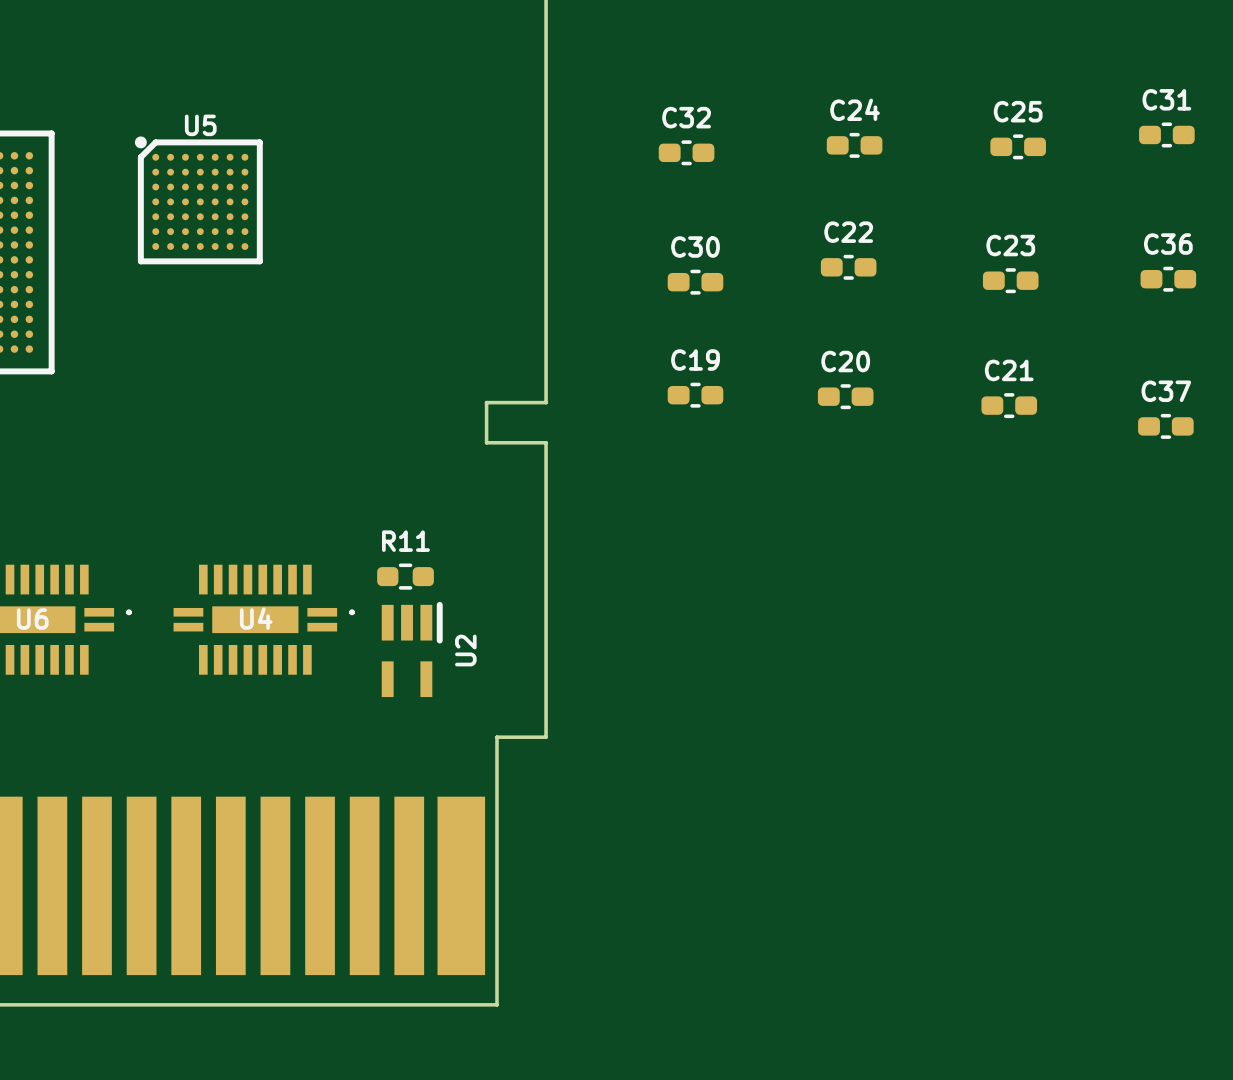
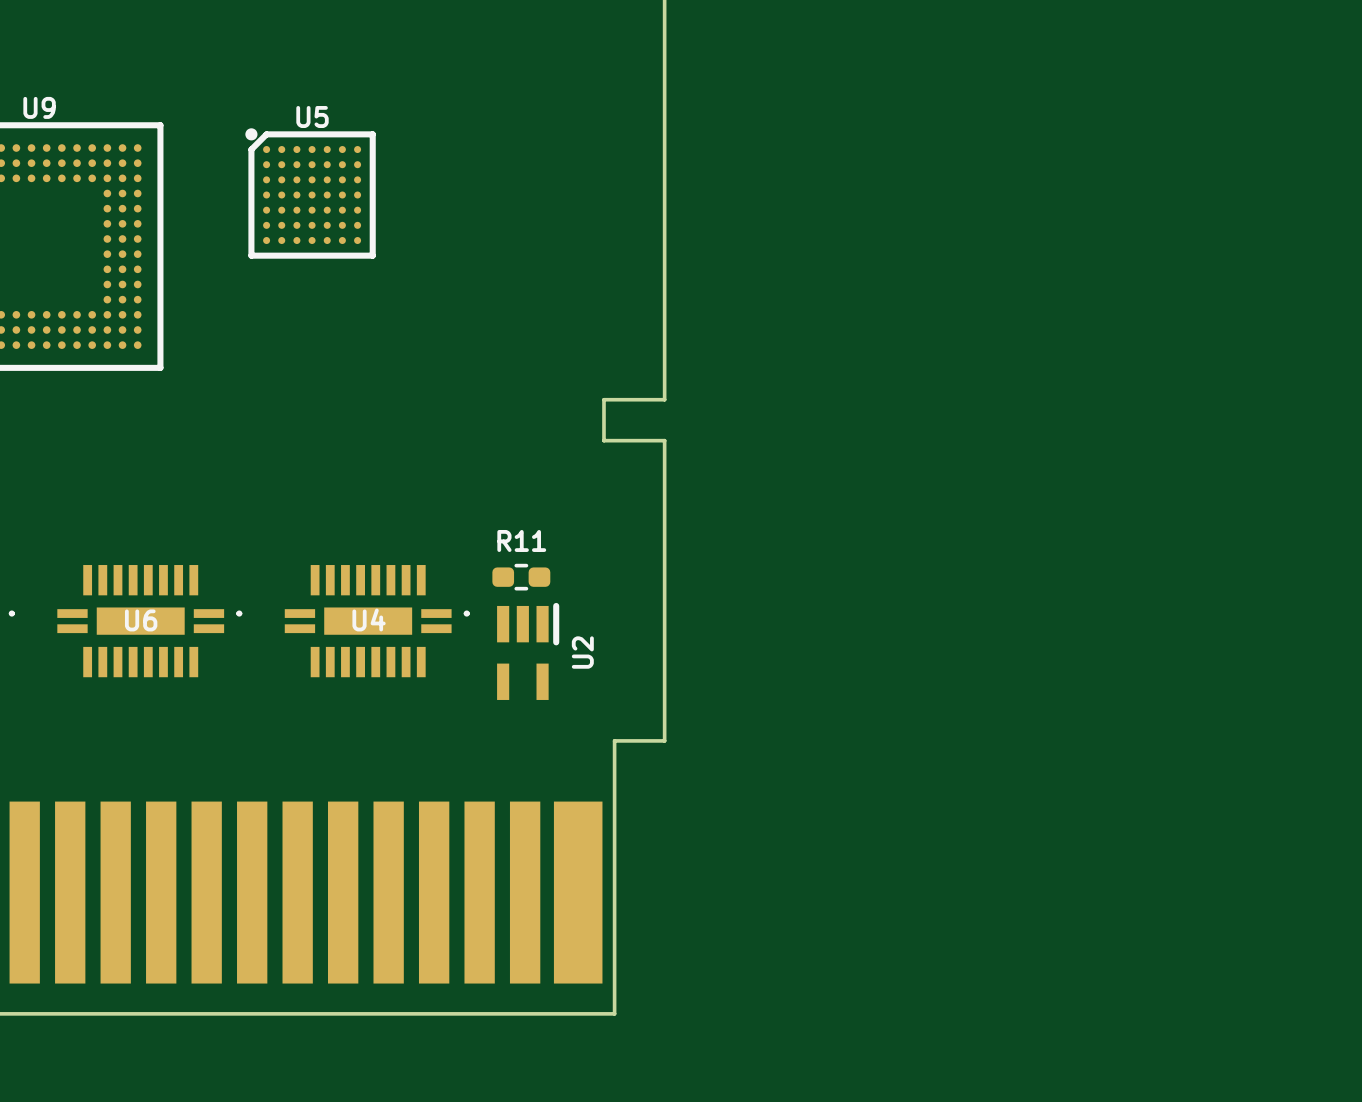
C31: (1166, 134) -> none
C24: (854, 145) -> none
C25: (1018, 146) -> none
C32: (686, 152) -> none
C22: (848, 267) -> none
C36: (1168, 279) -> none
C23: (1010, 280) -> none
C30: (695, 282) -> none
C19: (695, 395) -> none
C20: (845, 396) -> none
C21: (1009, 405) -> none
C37: (1165, 426) -> none

